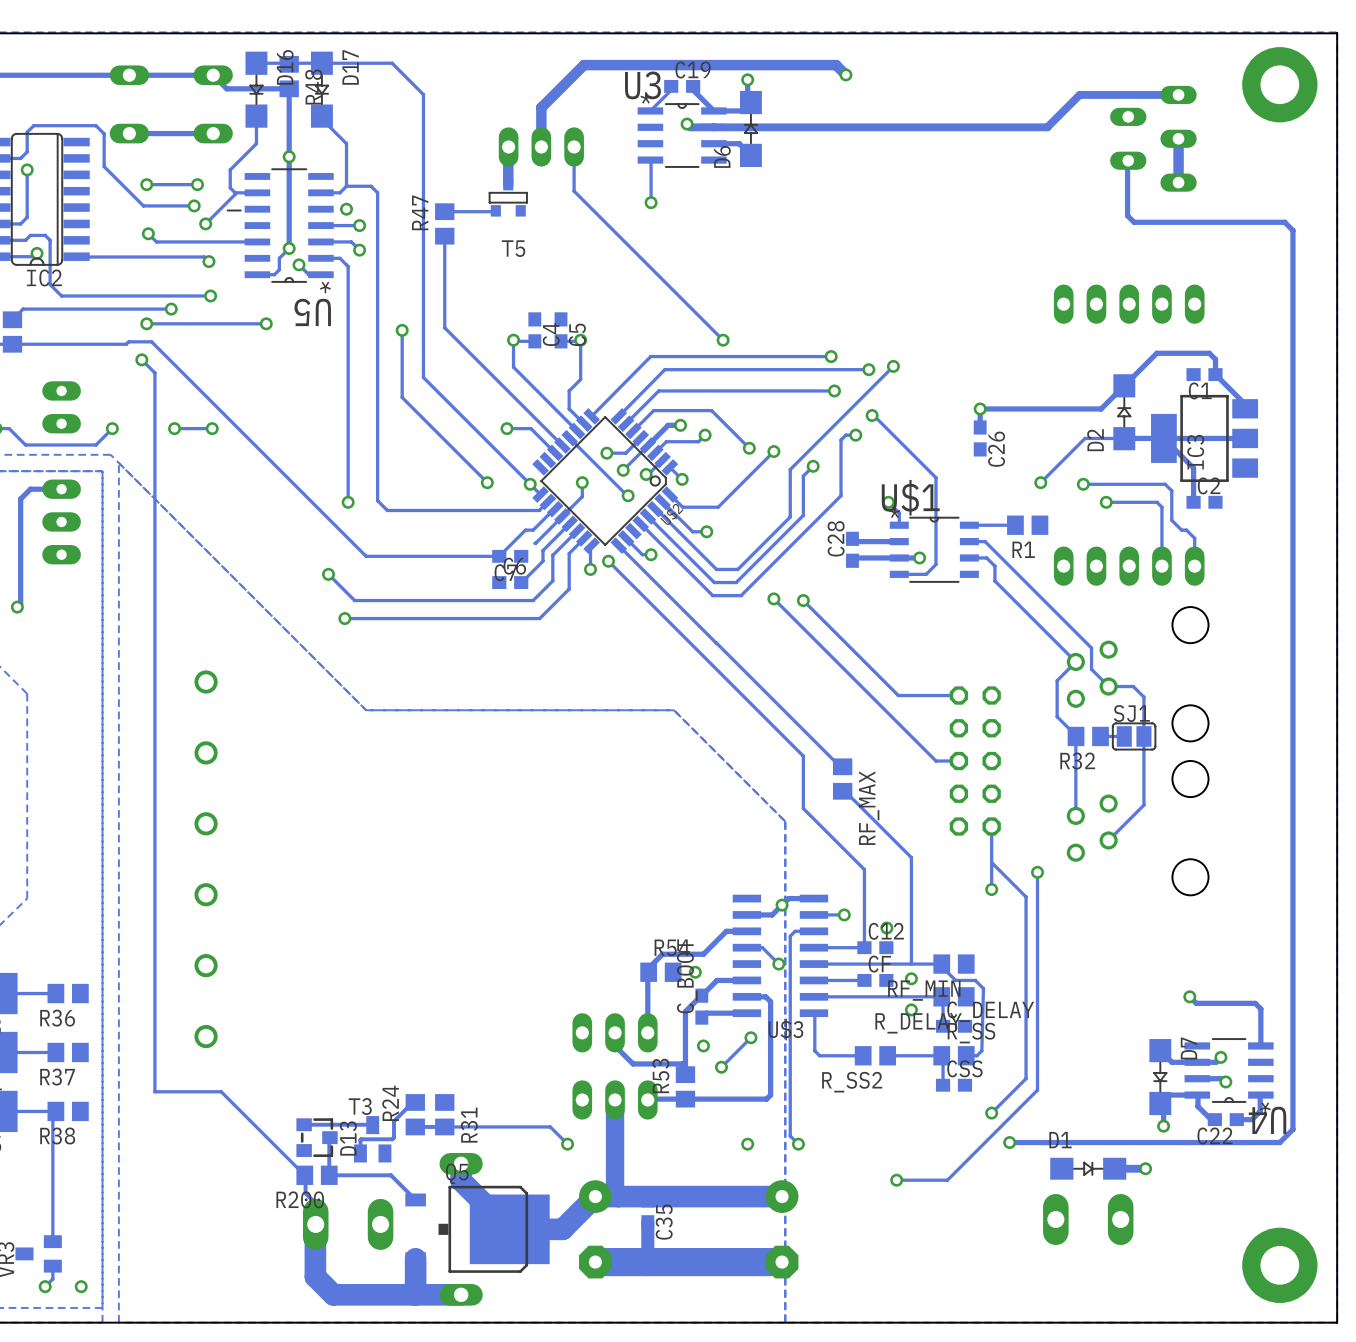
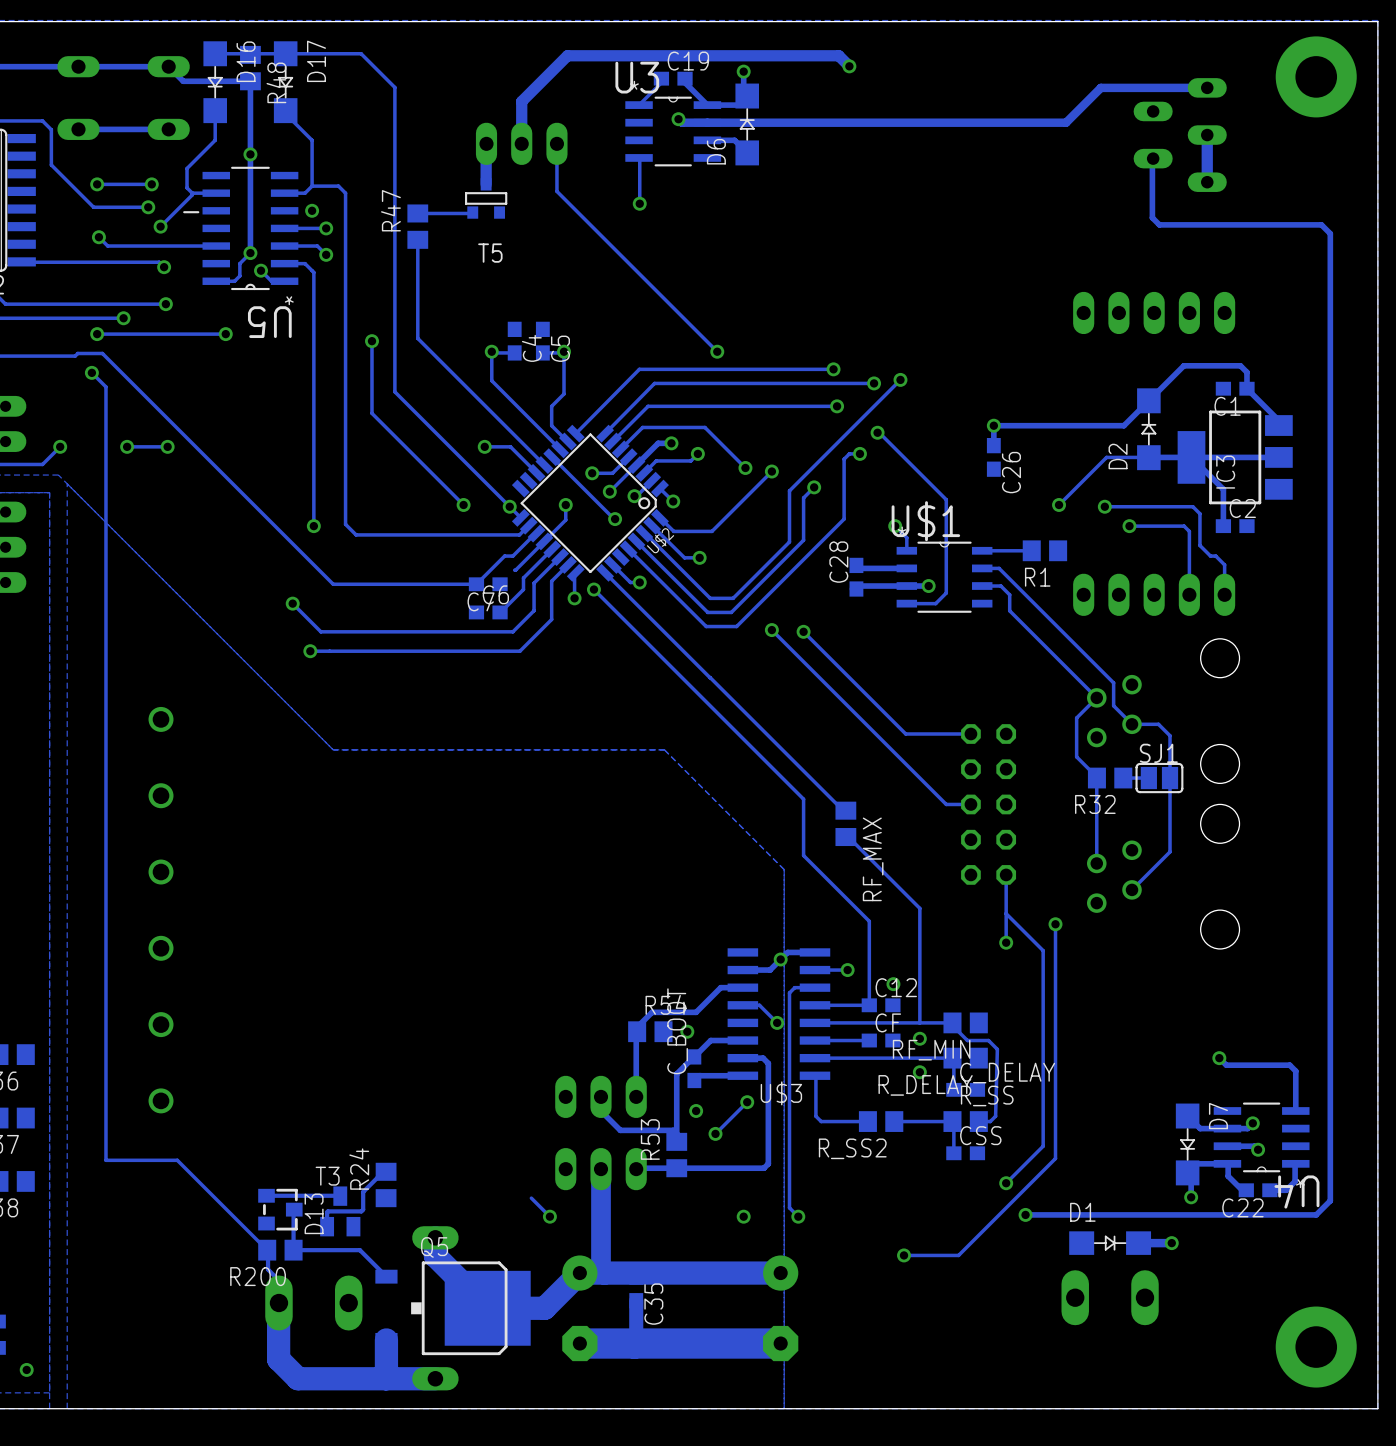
R31: (444, 1114) -> none
track: (550, 1126) (415, 1126) -> none

